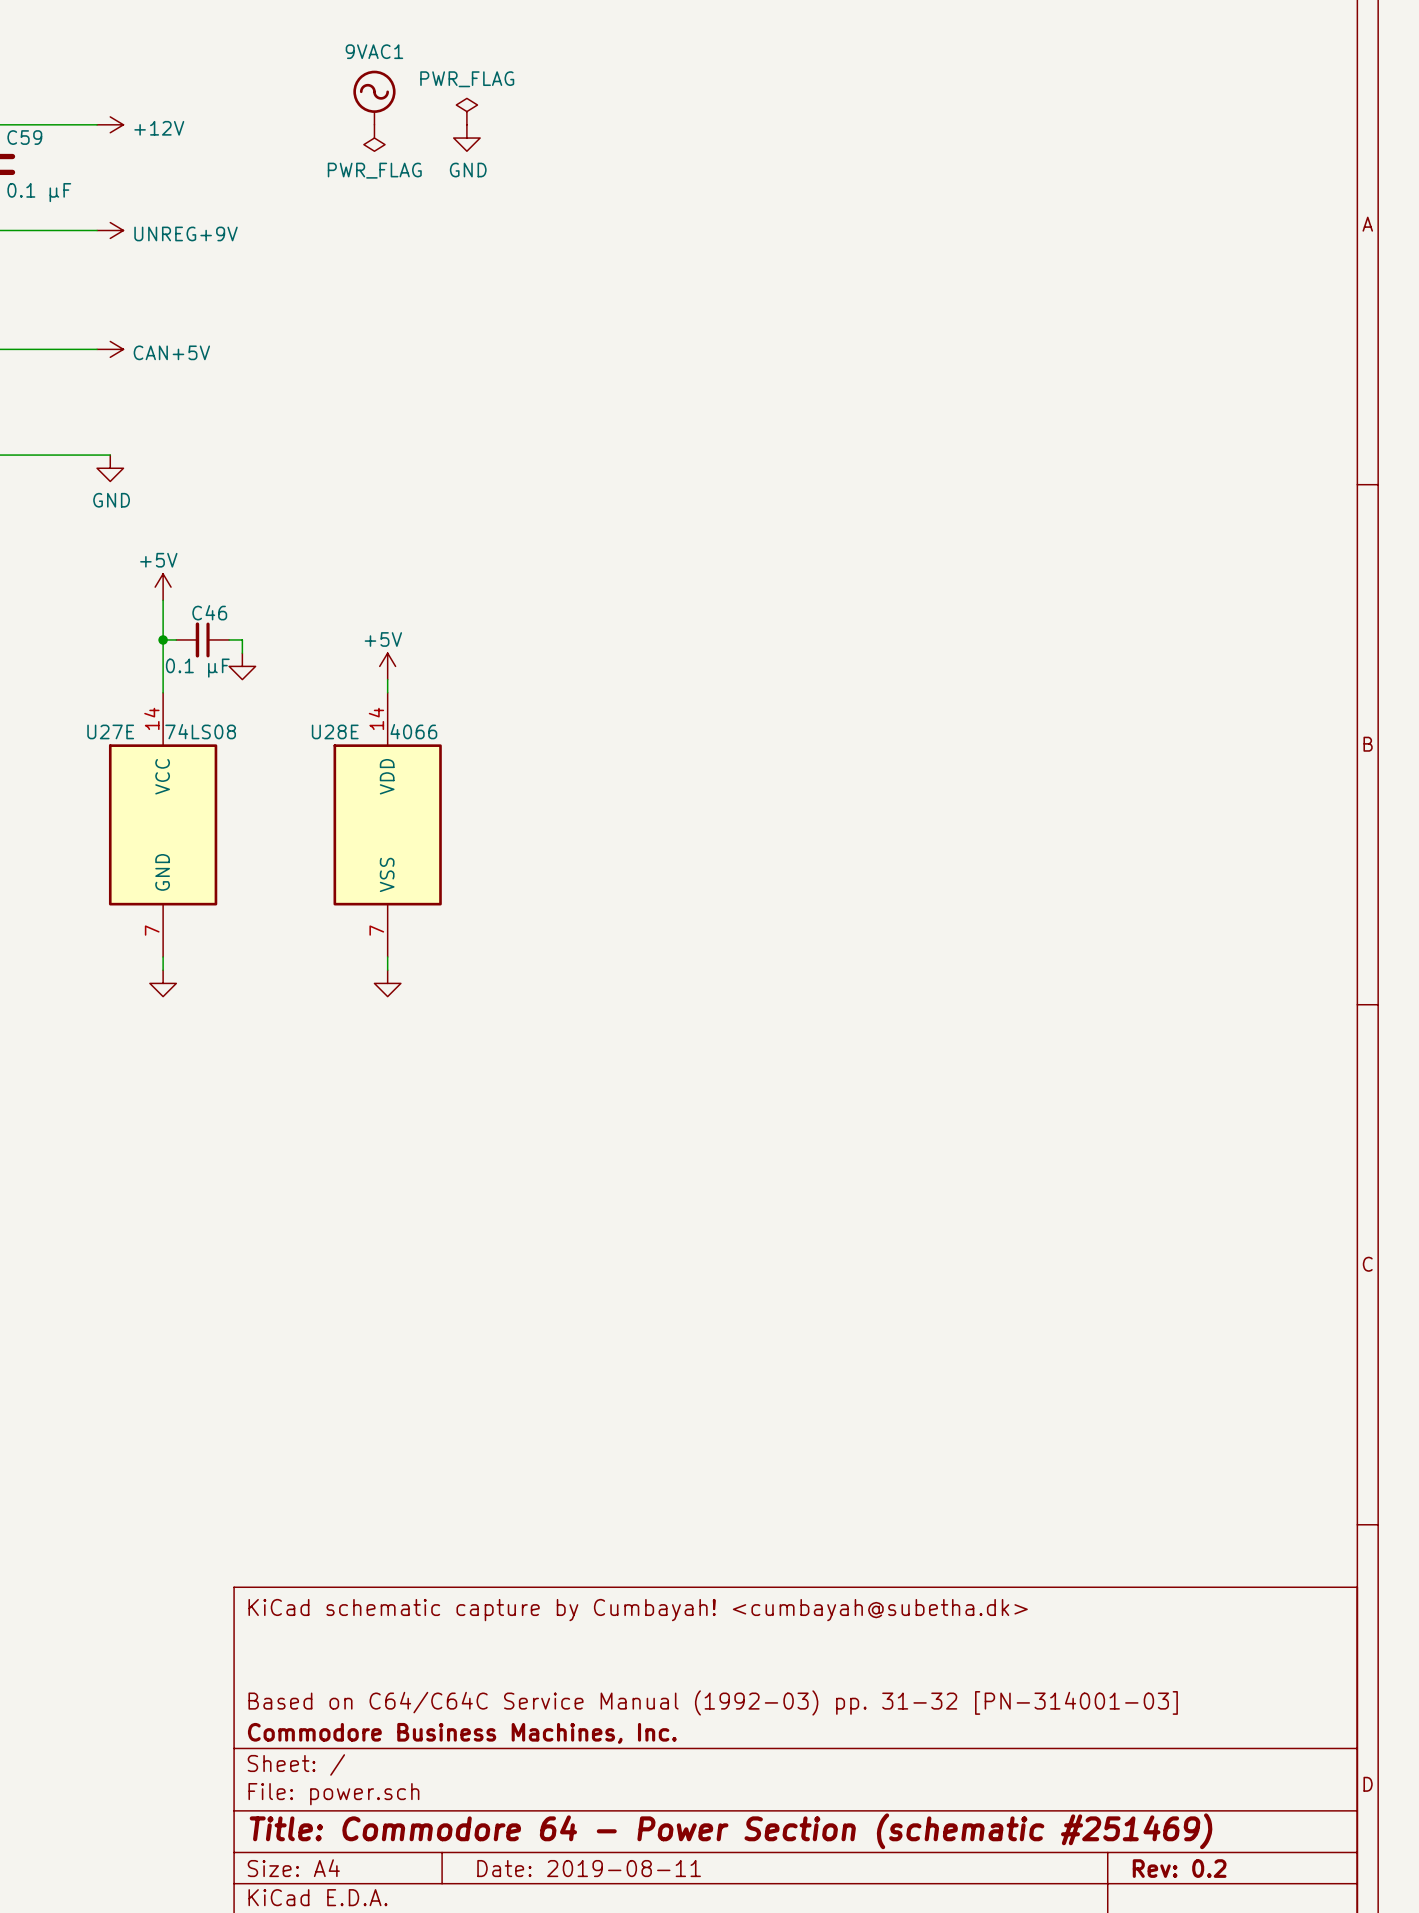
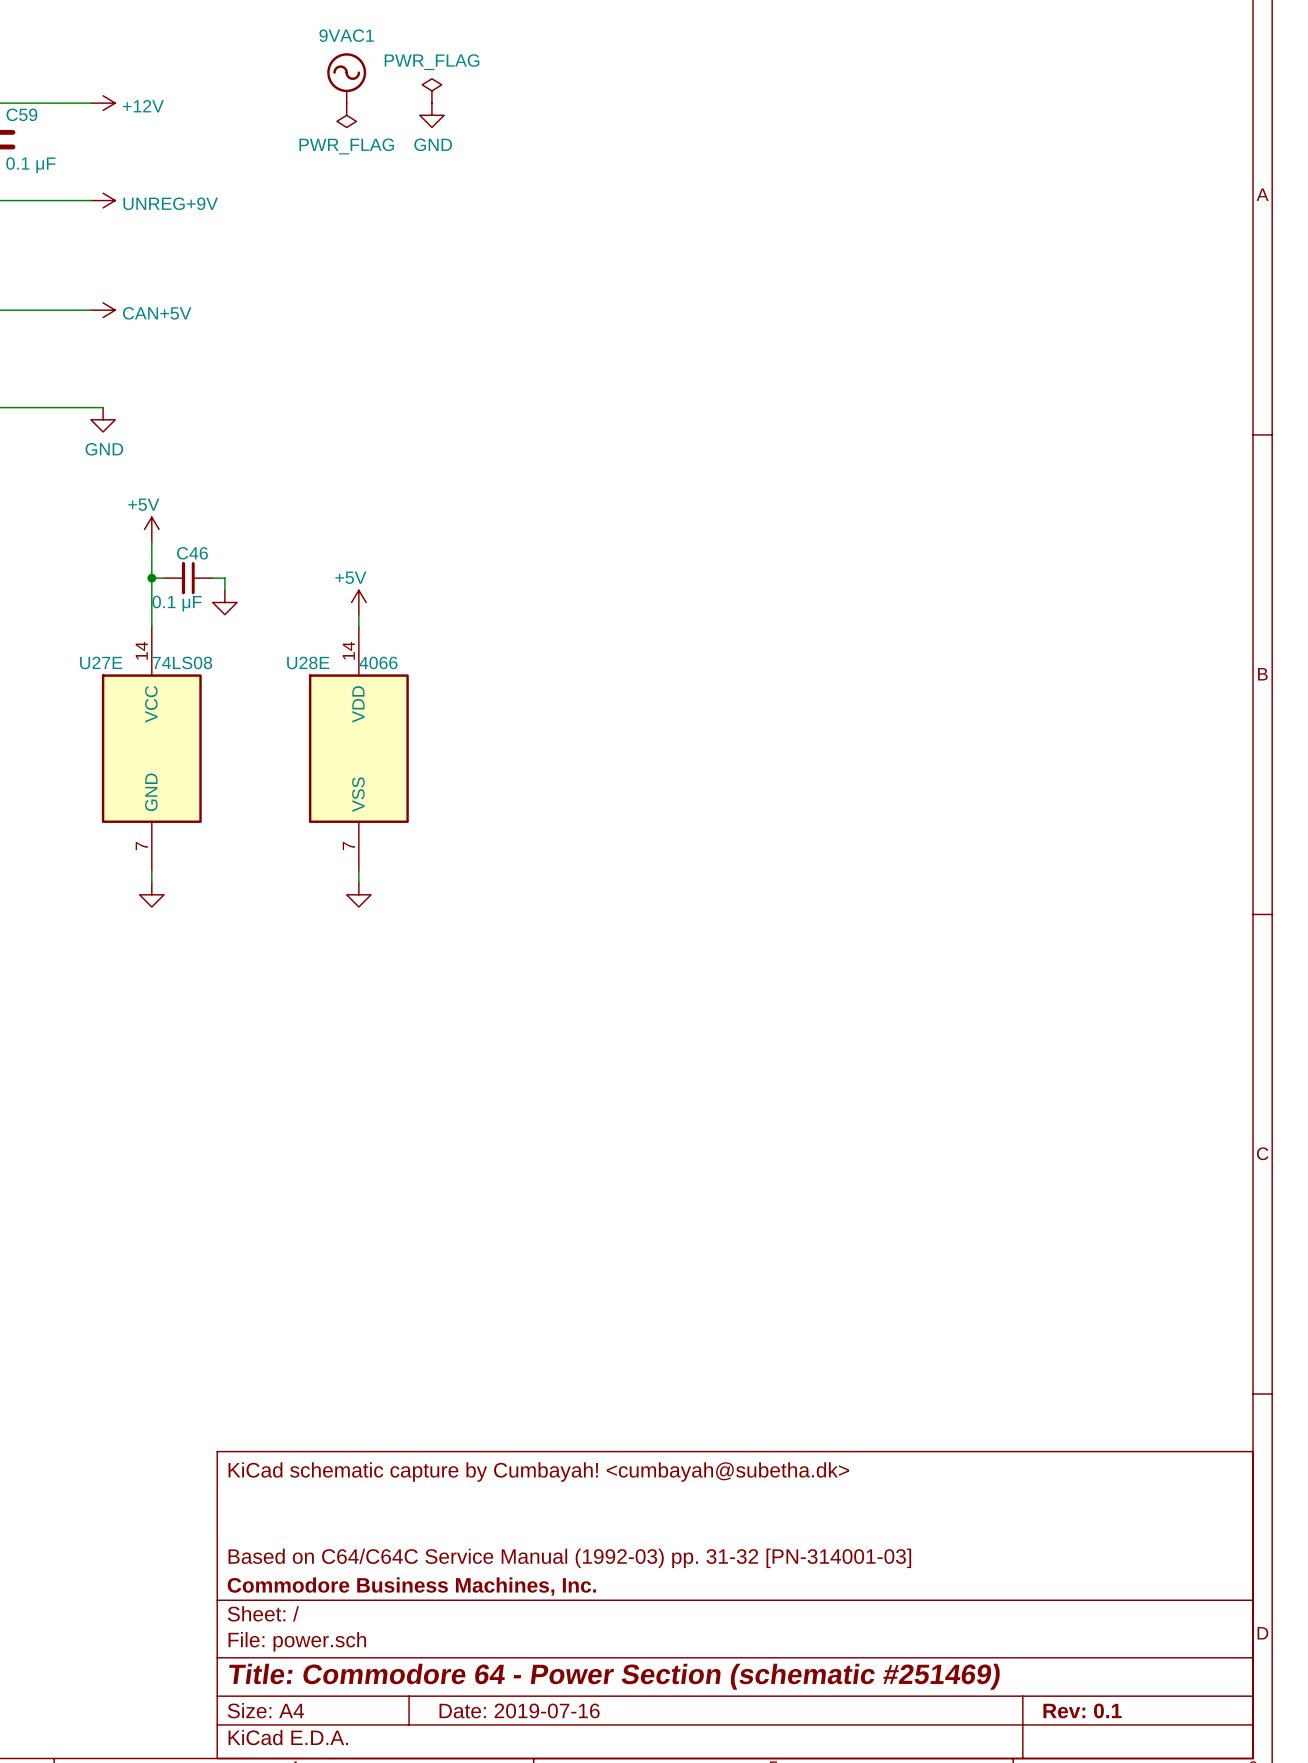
title block: Date: 2019-08-11 (589, 1868) -> Date: 2019-07-16 (519, 1710)
title block: Rev: 0.2 (1179, 1868) -> Rev: 0.1 (1082, 1710)

